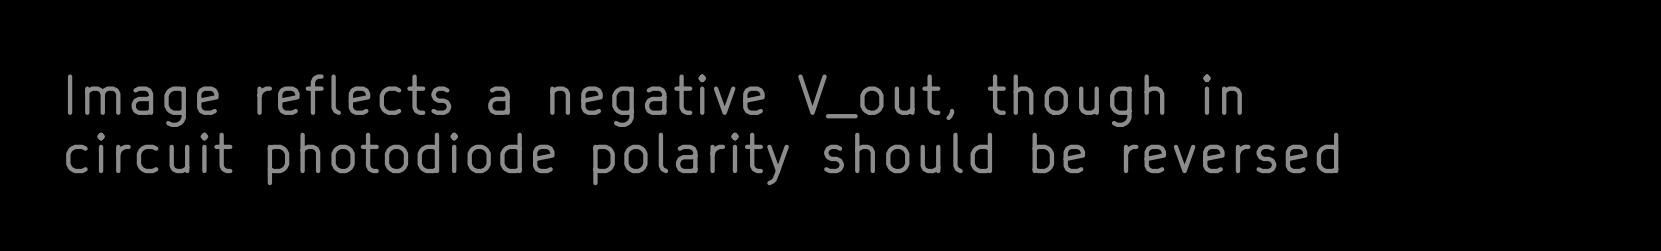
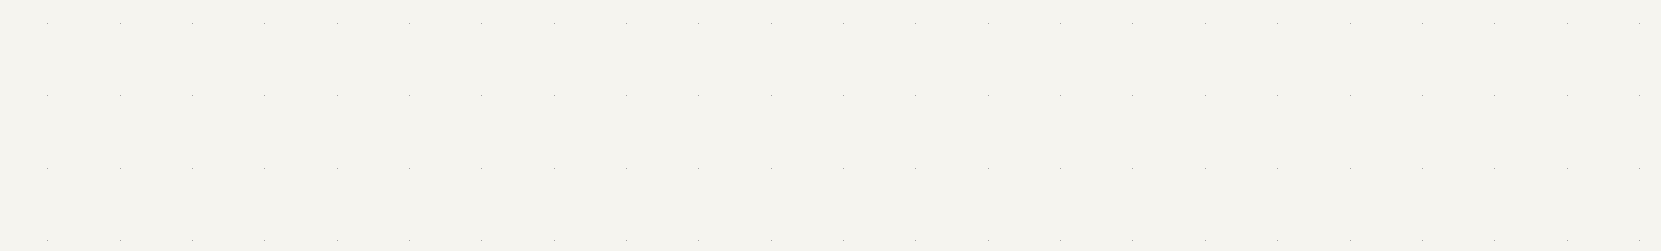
text: Image reflects a negative V_out, though in (654, 100) -> none
text: circuit photodiode polarity should be reversed (702, 158) -> none

